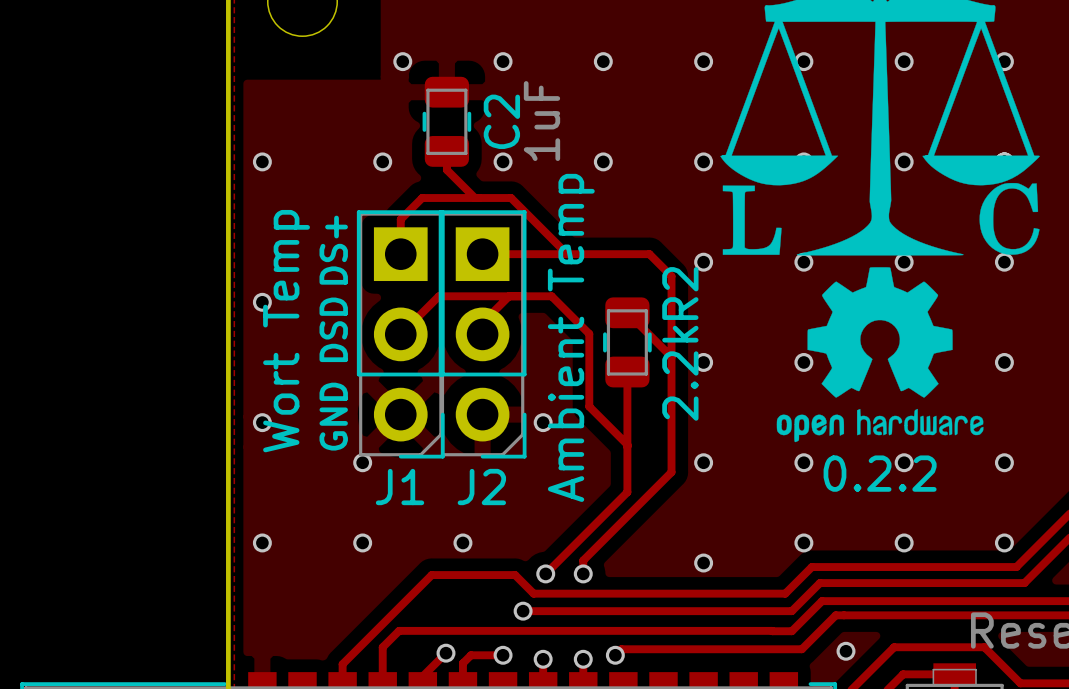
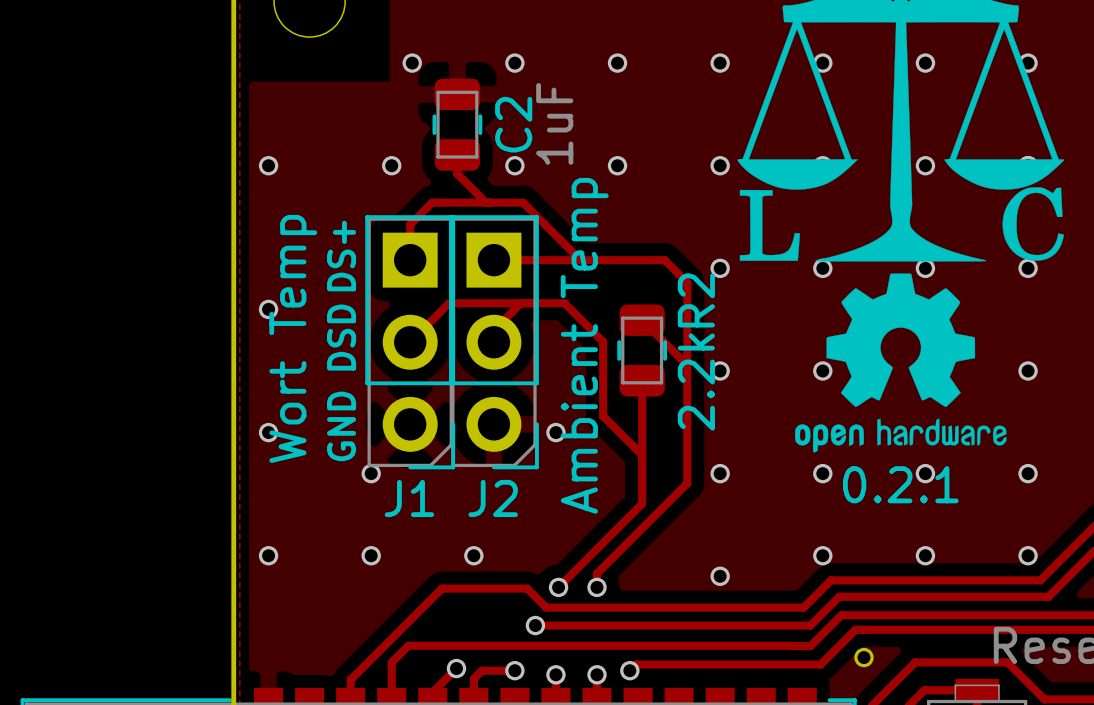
text: 0.2.2 (880, 473) -> 0.2.1 (900, 484)
part: none -> (863, 657)
via: (846, 651) -> none

